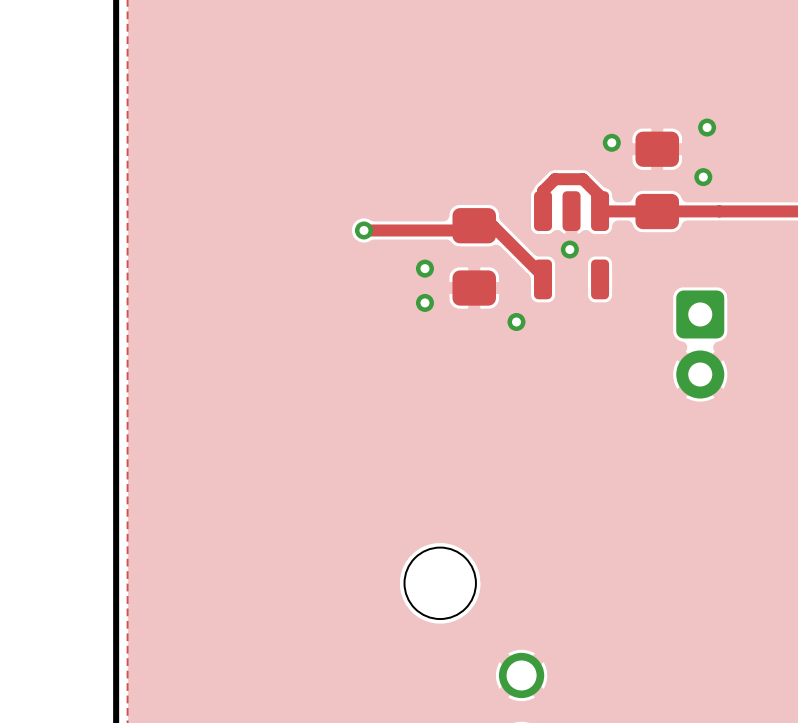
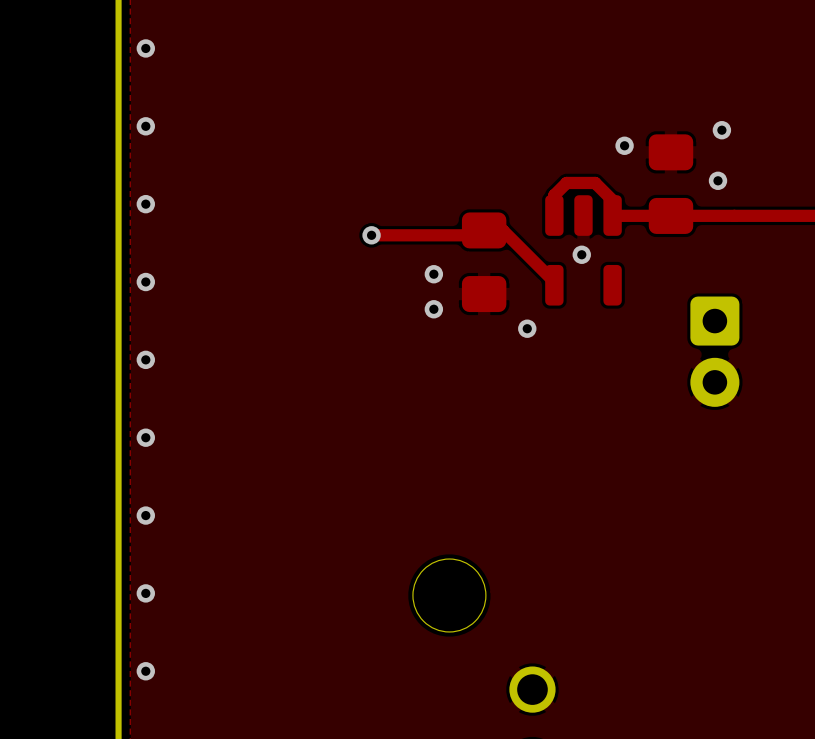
via: none -> (145, 48)
via: none -> (145, 126)
via: none -> (145, 204)
via: none -> (145, 282)
via: none -> (145, 359)
via: none -> (145, 437)
via: none -> (145, 515)
via: none -> (145, 593)
via: none -> (145, 671)

